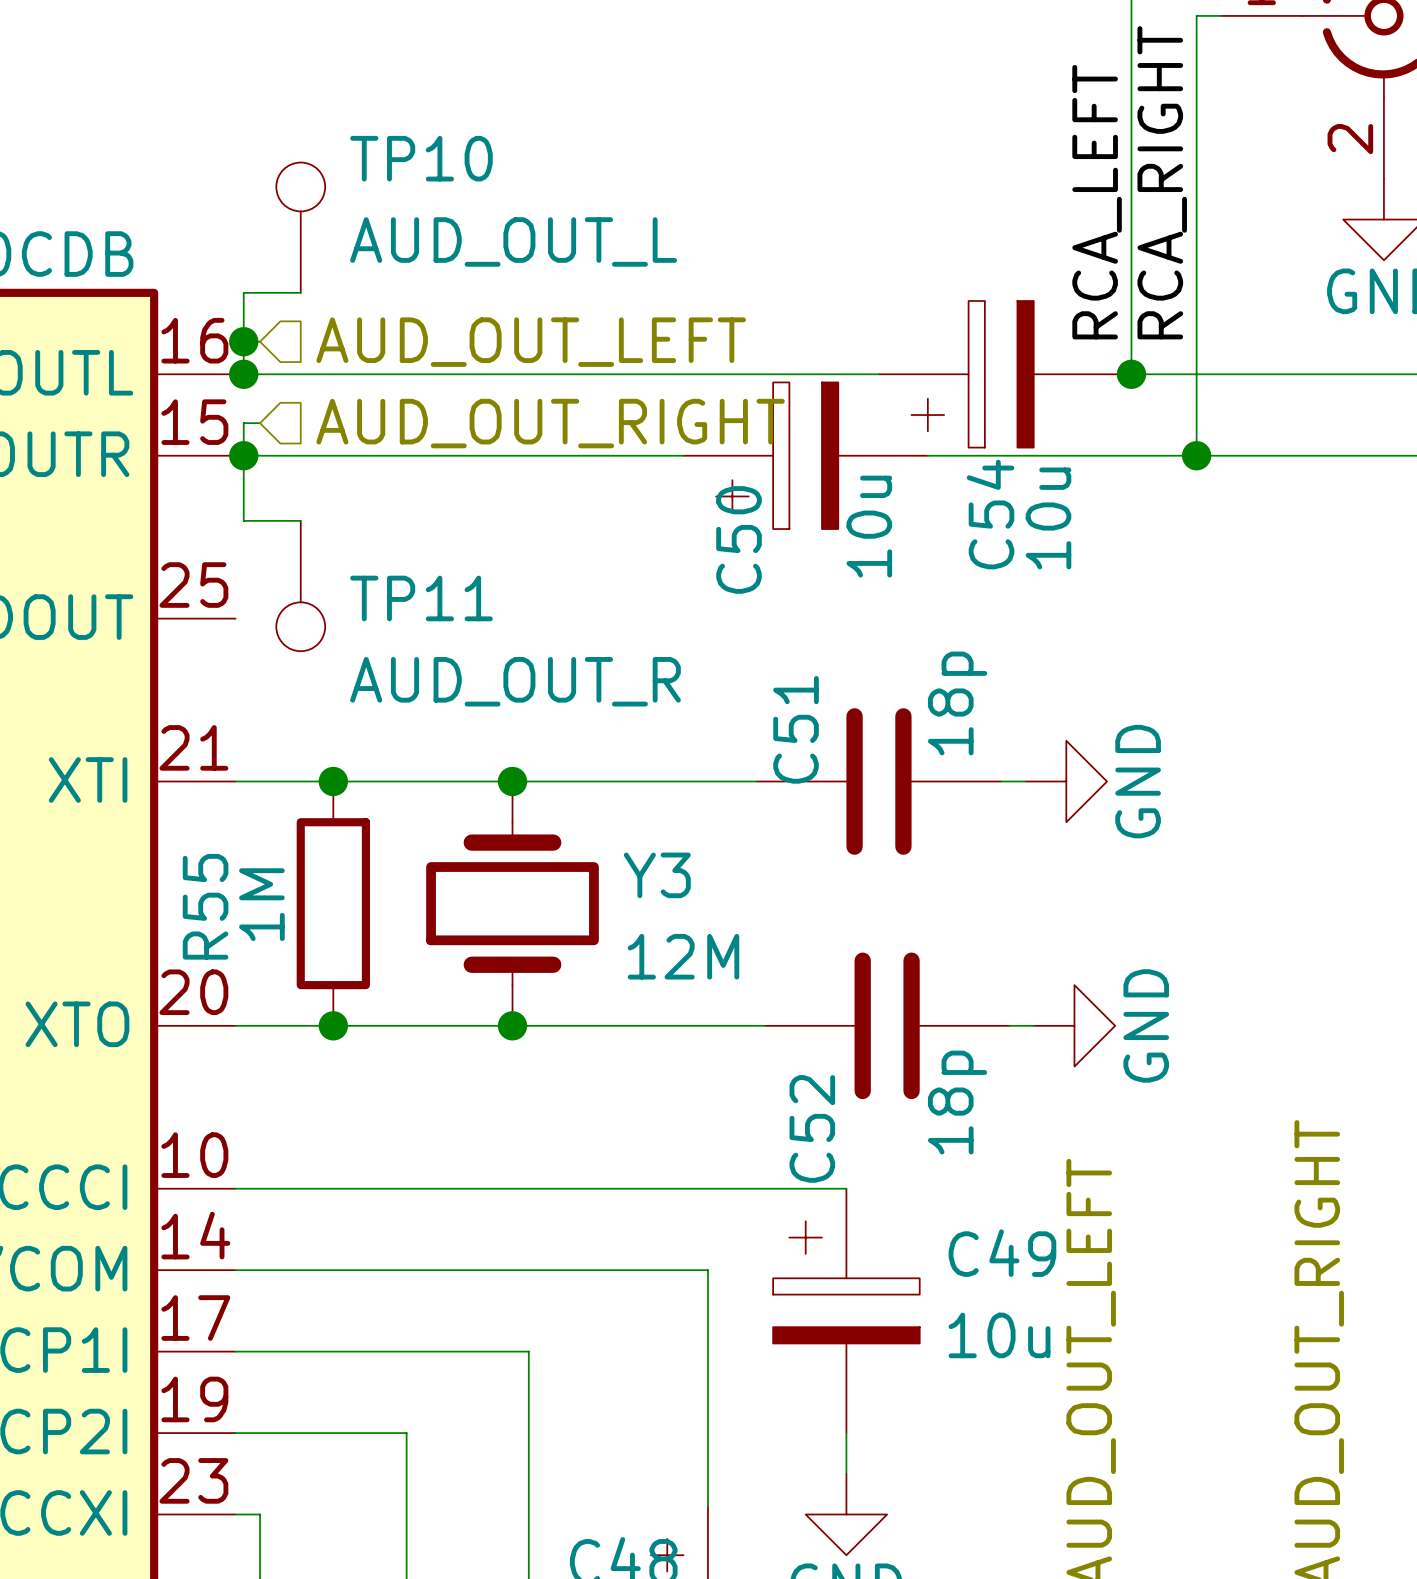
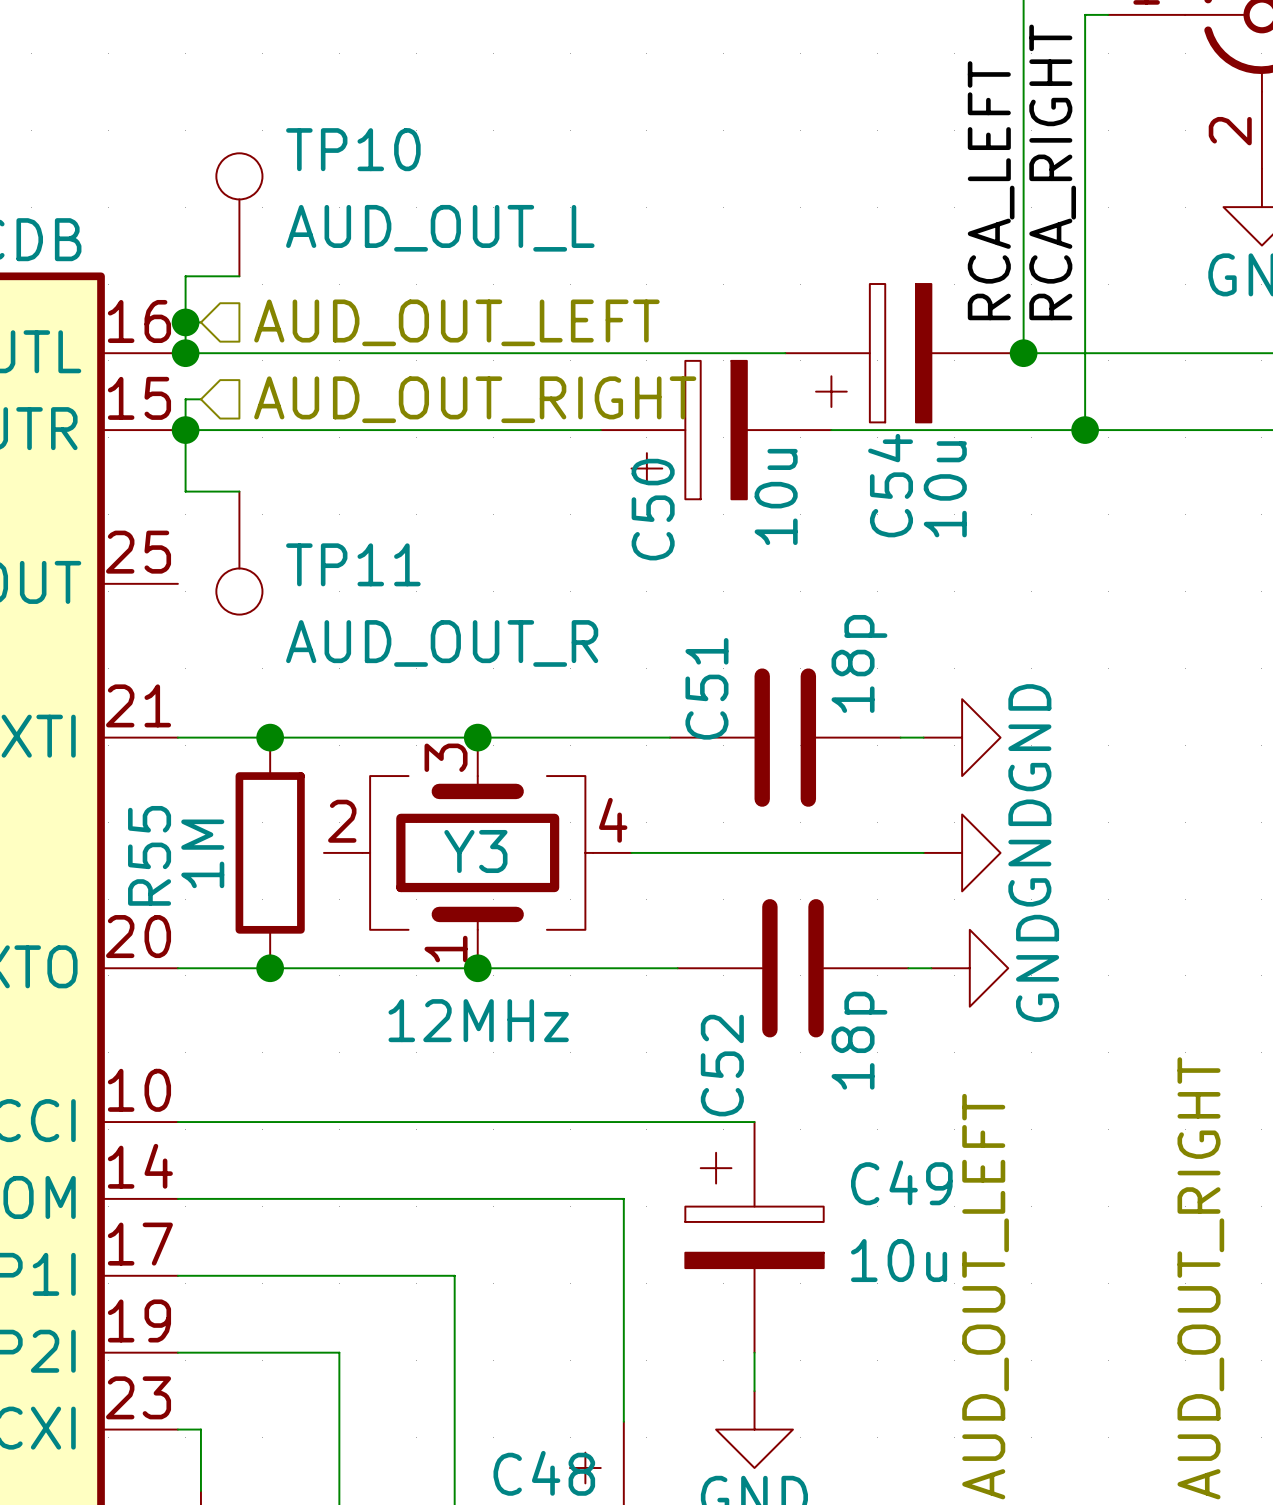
Y3 symbol: [426, 781, 599, 1026] -> [323, 737, 632, 969]
junction position: (512, 781) -> (477, 737)
Y3 name position: Y3 (657, 875) -> Y3 (475, 851)
wire: none -> (631, 852) (923, 852)
power symbol: none -> GND (962, 852)
Y3 value: 12M (683, 956) -> 12MHz (478, 1020)
junction position: (512, 1025) -> (477, 968)

